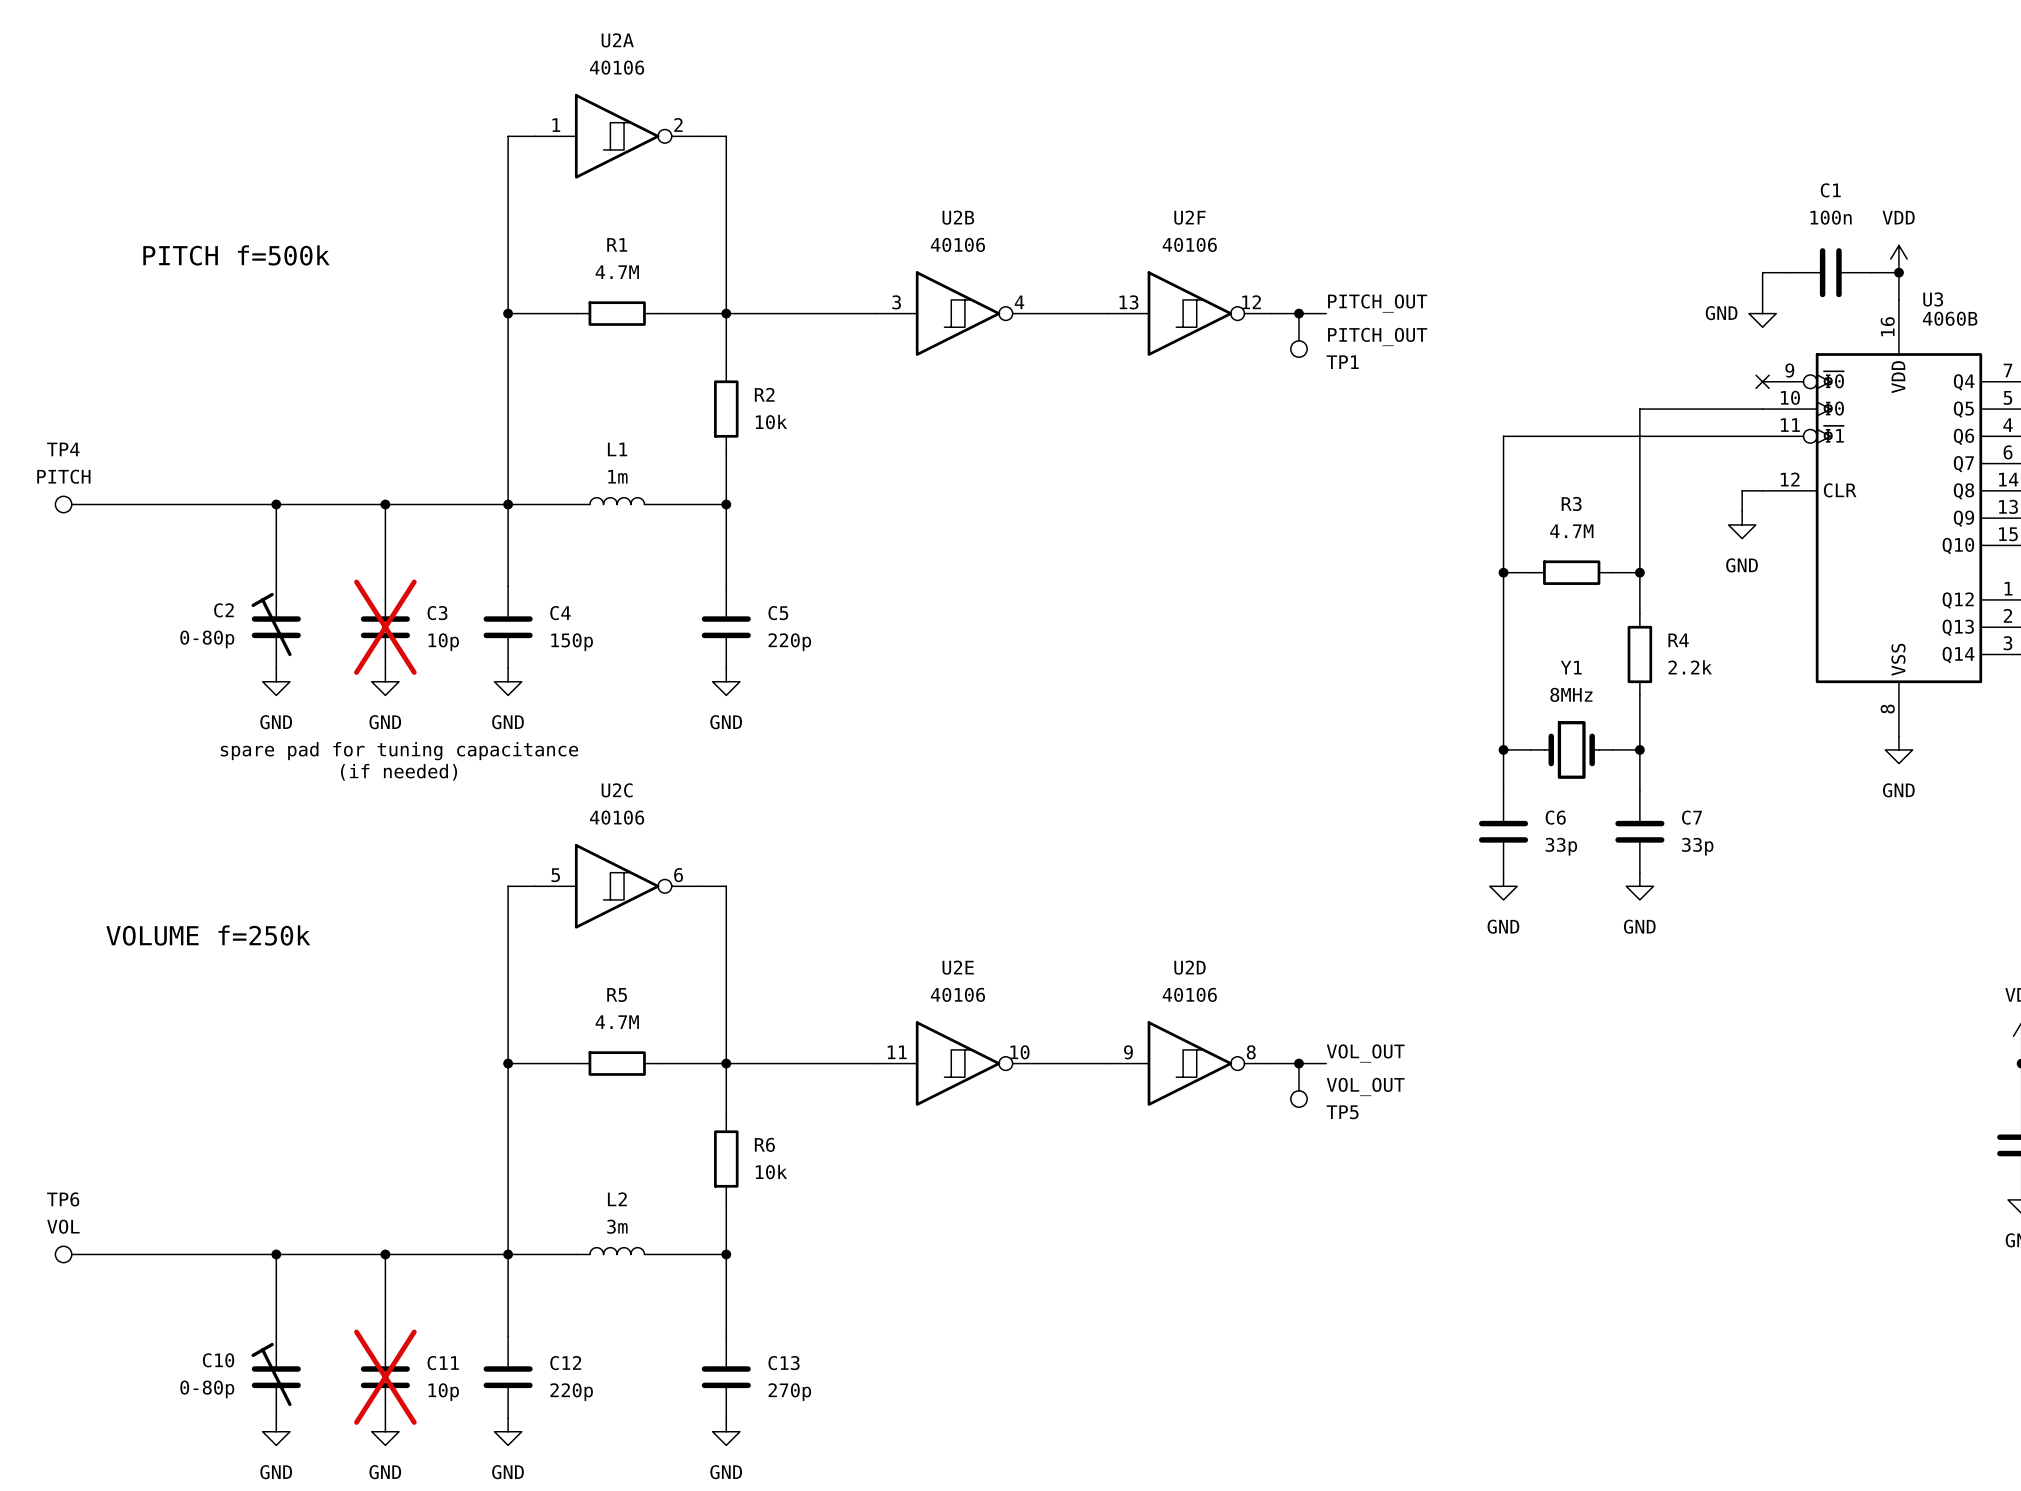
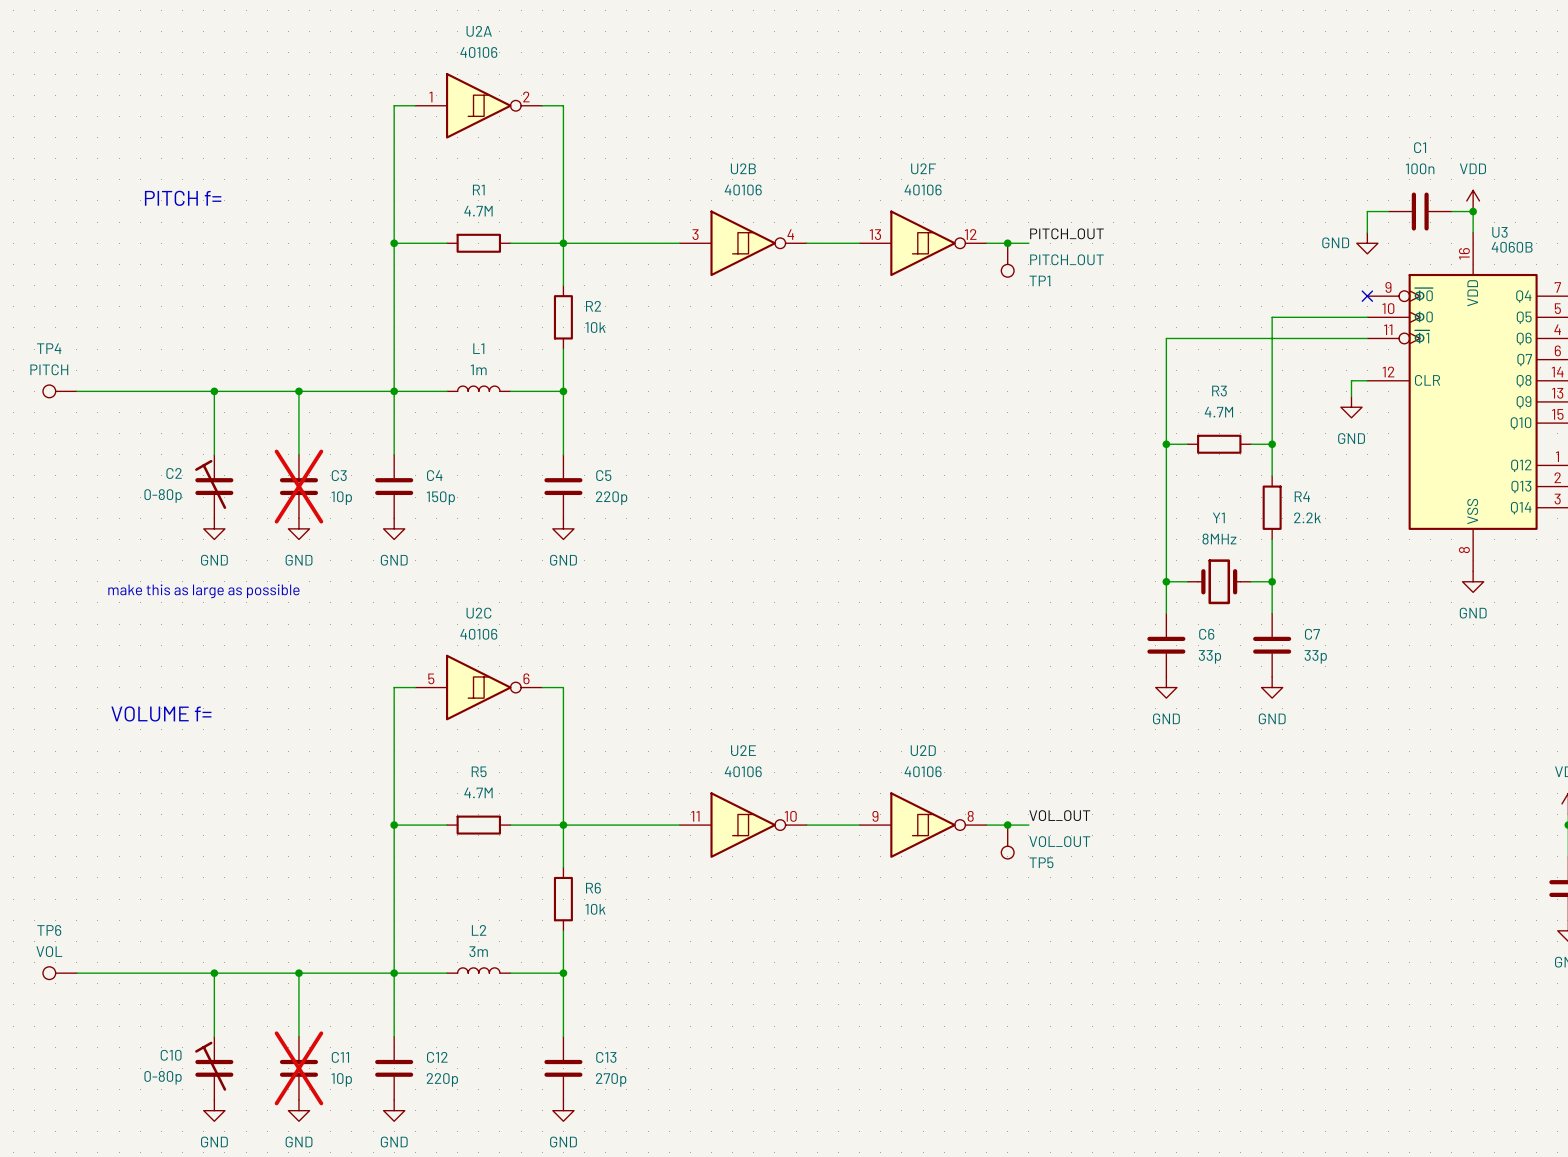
text: PITCH f=500k (236, 255) -> PITCH f= (183, 198)
text: spare pad for tuning capacitance (399, 751) -> none
text: none -> make this as large as possible (203, 591)
text: (if needed) (399, 772) -> none
text: VOLUME f=250k (208, 935) -> VOLUME f= (161, 713)

